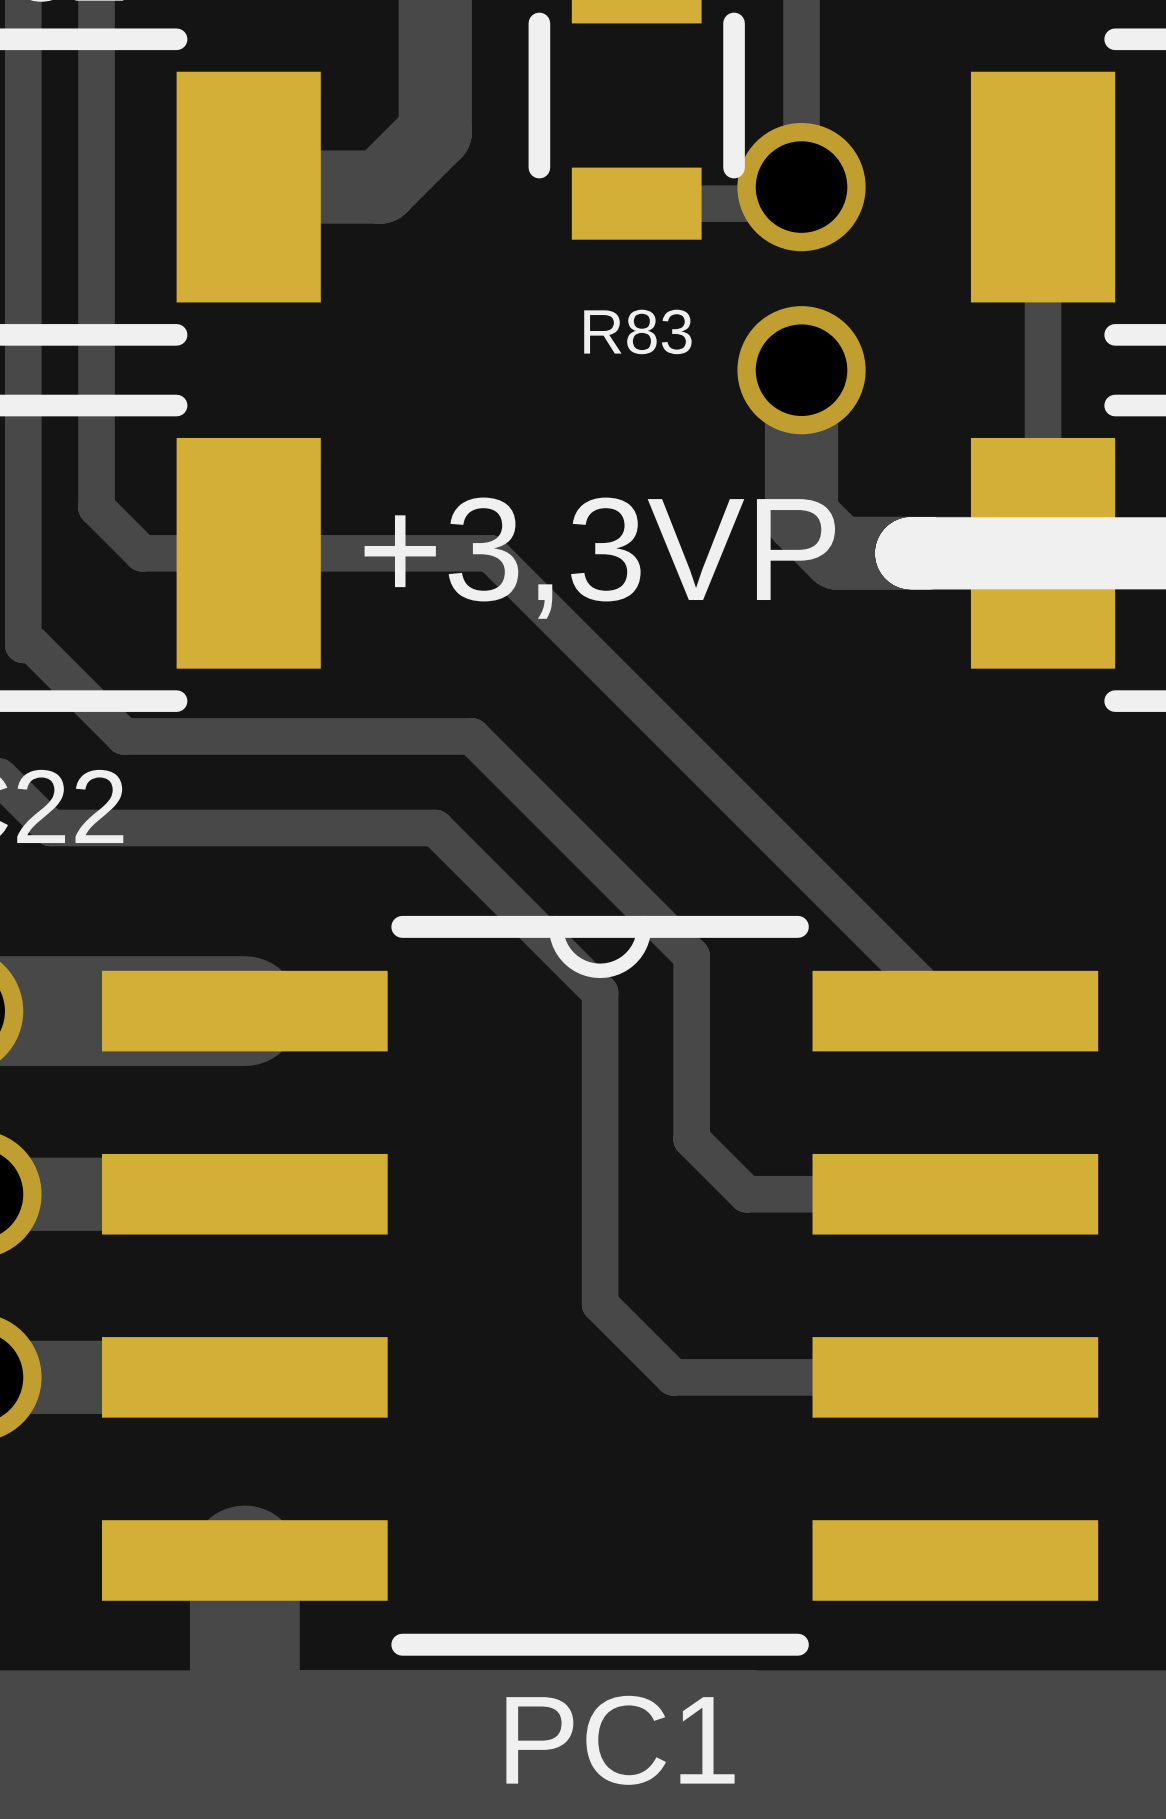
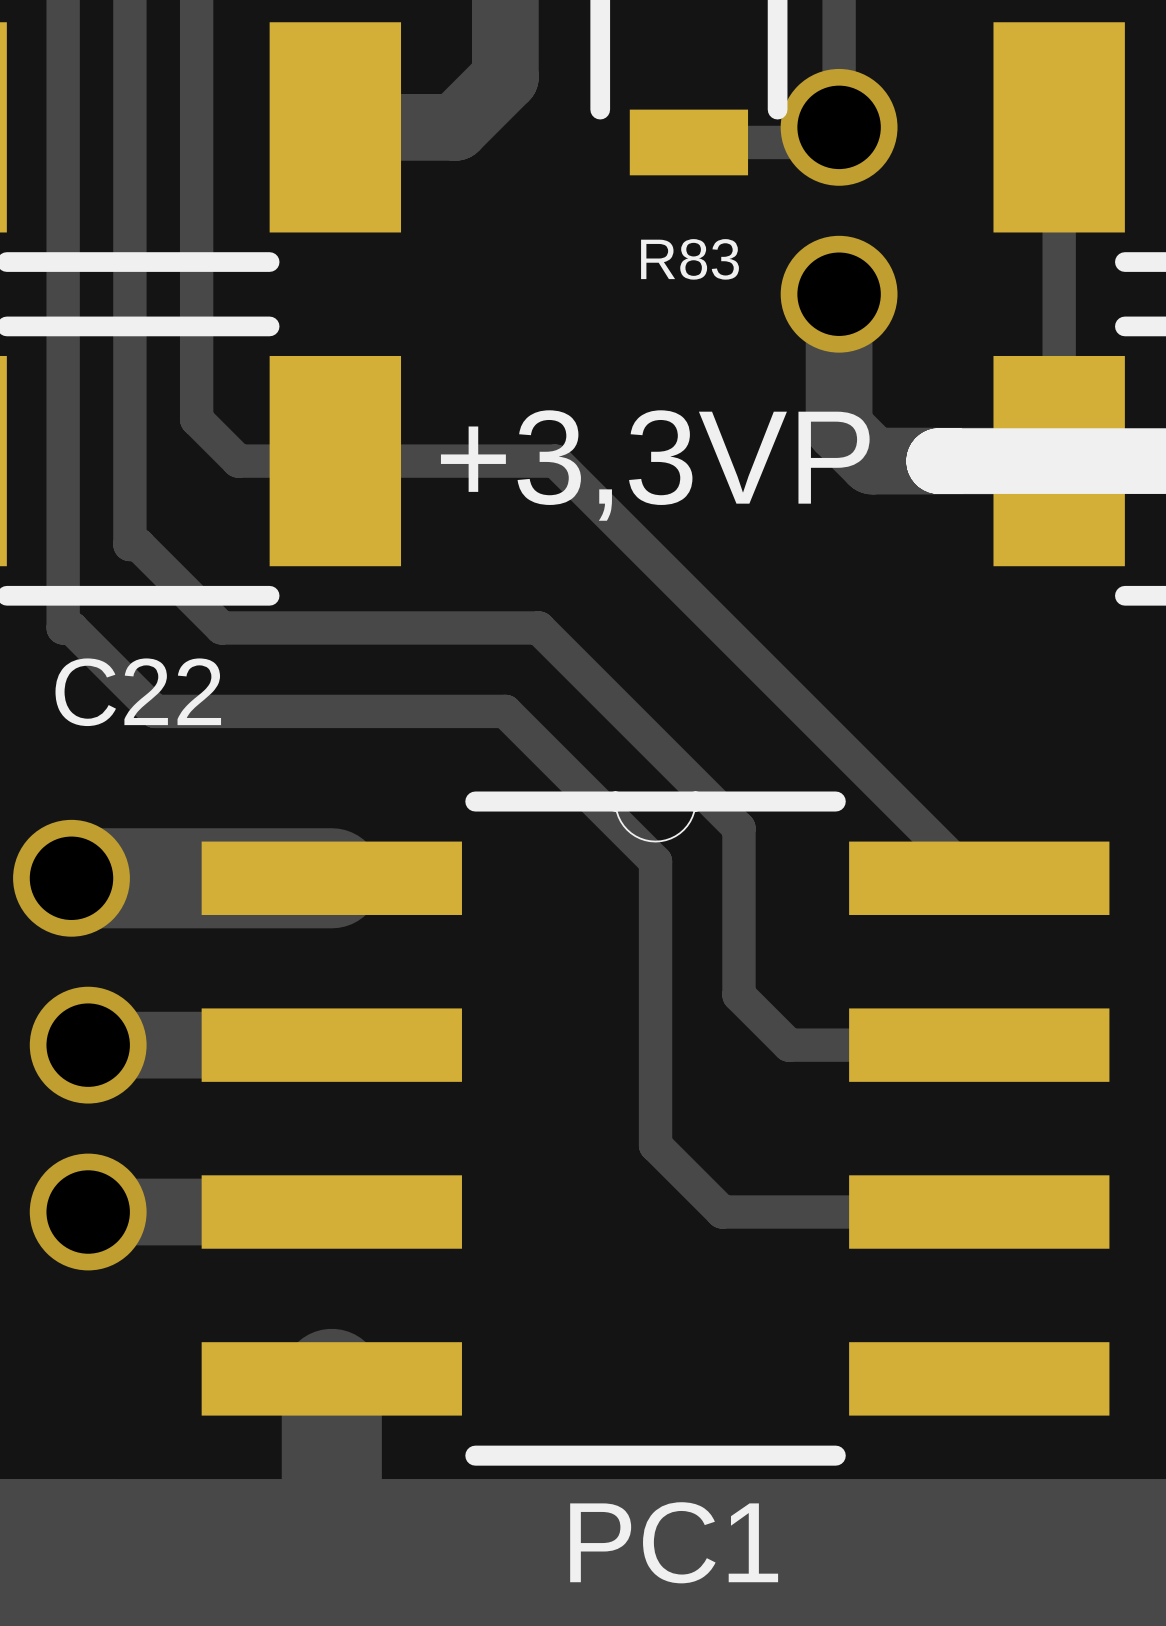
PC1 footprint: [102, 915, 1099, 1656] -> [201, 791, 1110, 1466]

